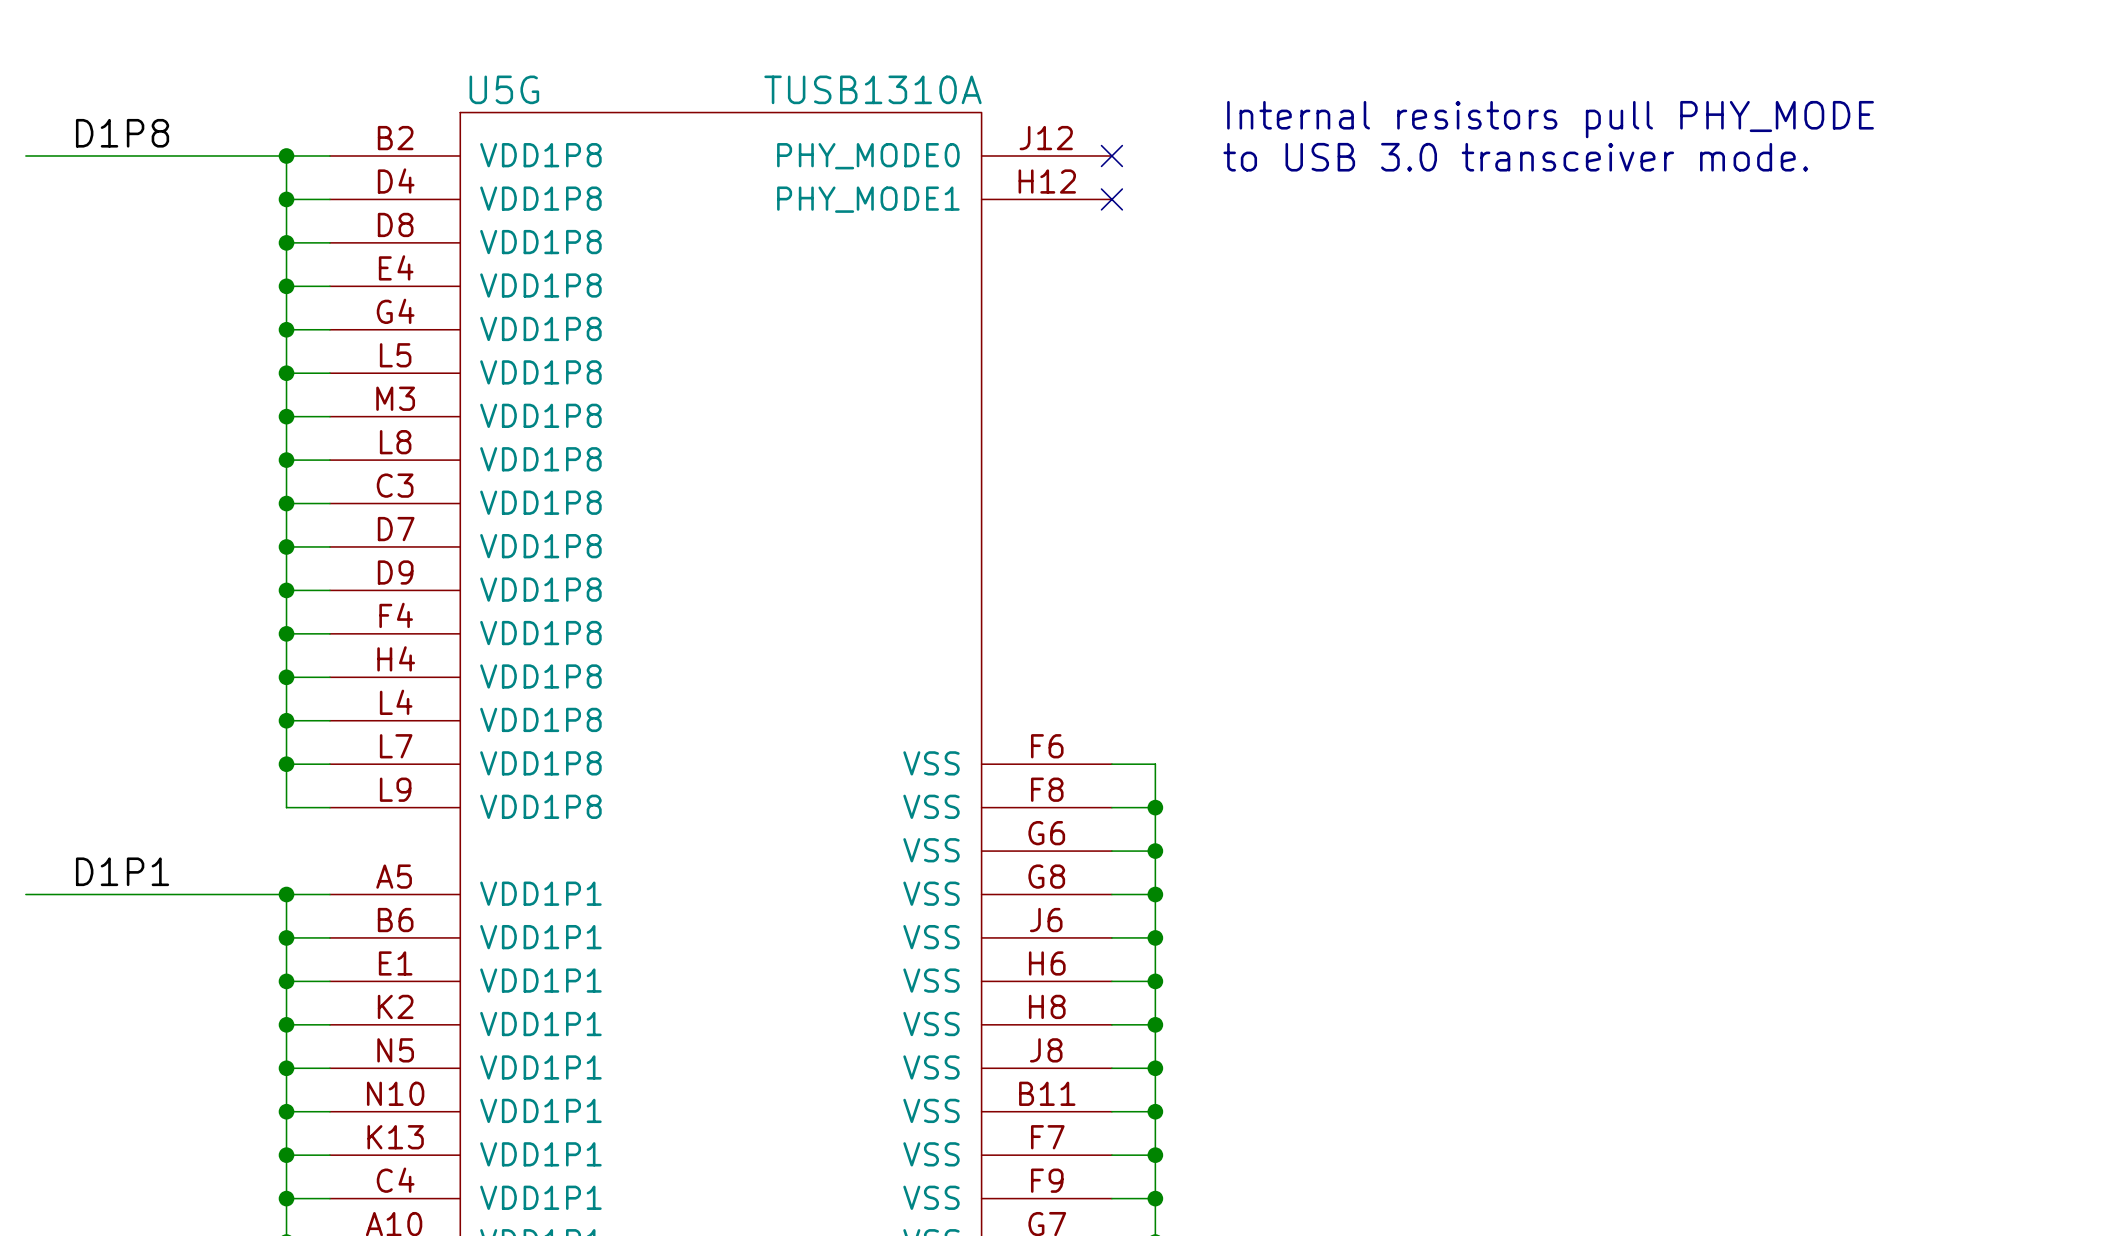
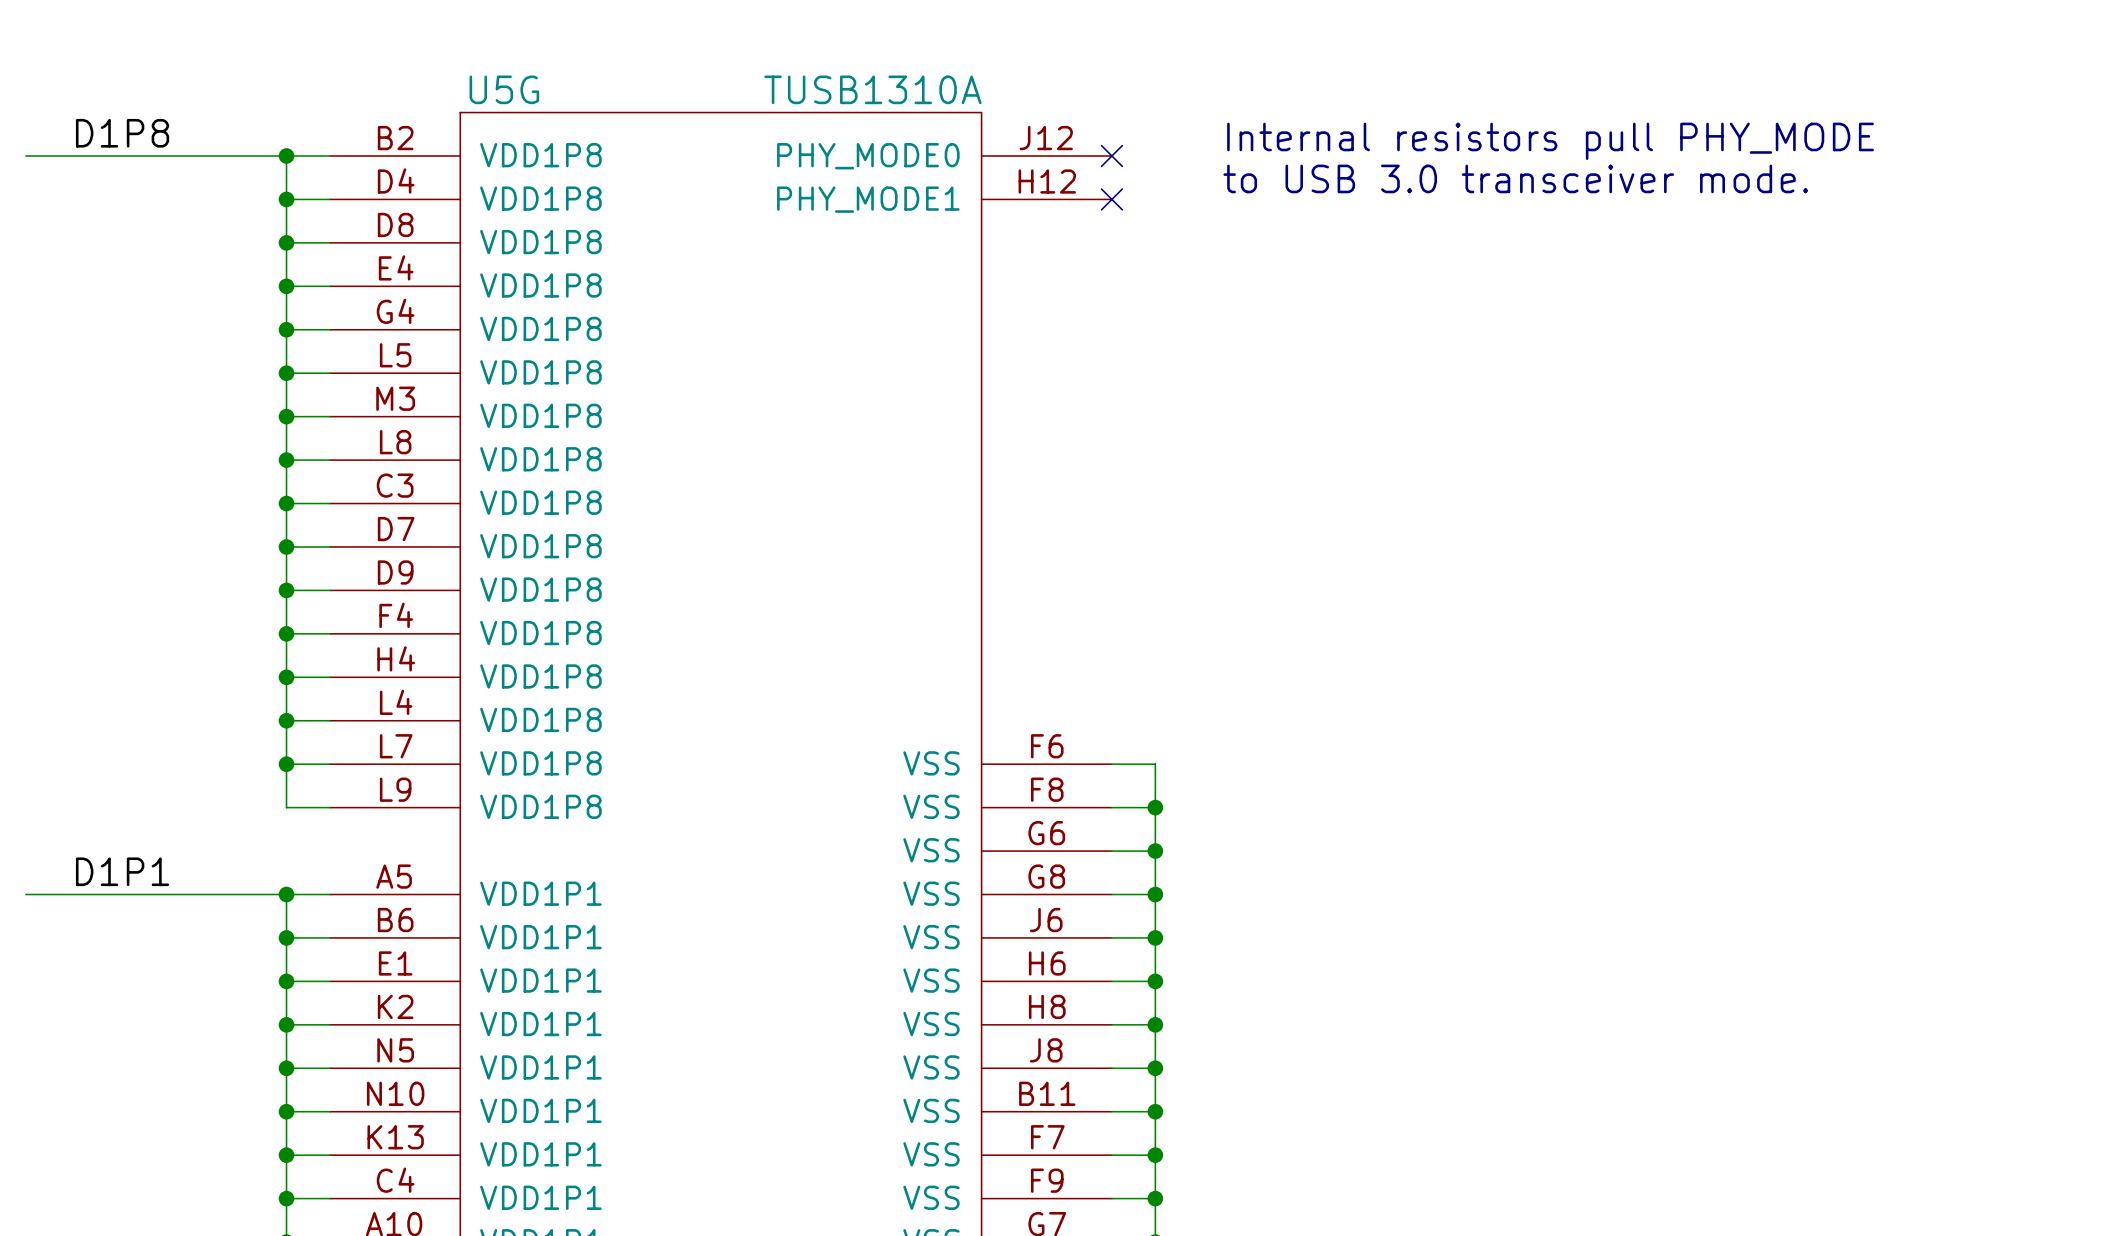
text position: Internal resistors pull PHY_MODE (1550, 119) -> Internal resistors pull PHY_MODE (1550, 141)
text position: to USB 3.0 transceiver mode. (1515, 157) -> to USB 3.0 transceiver mode. (1515, 178)

